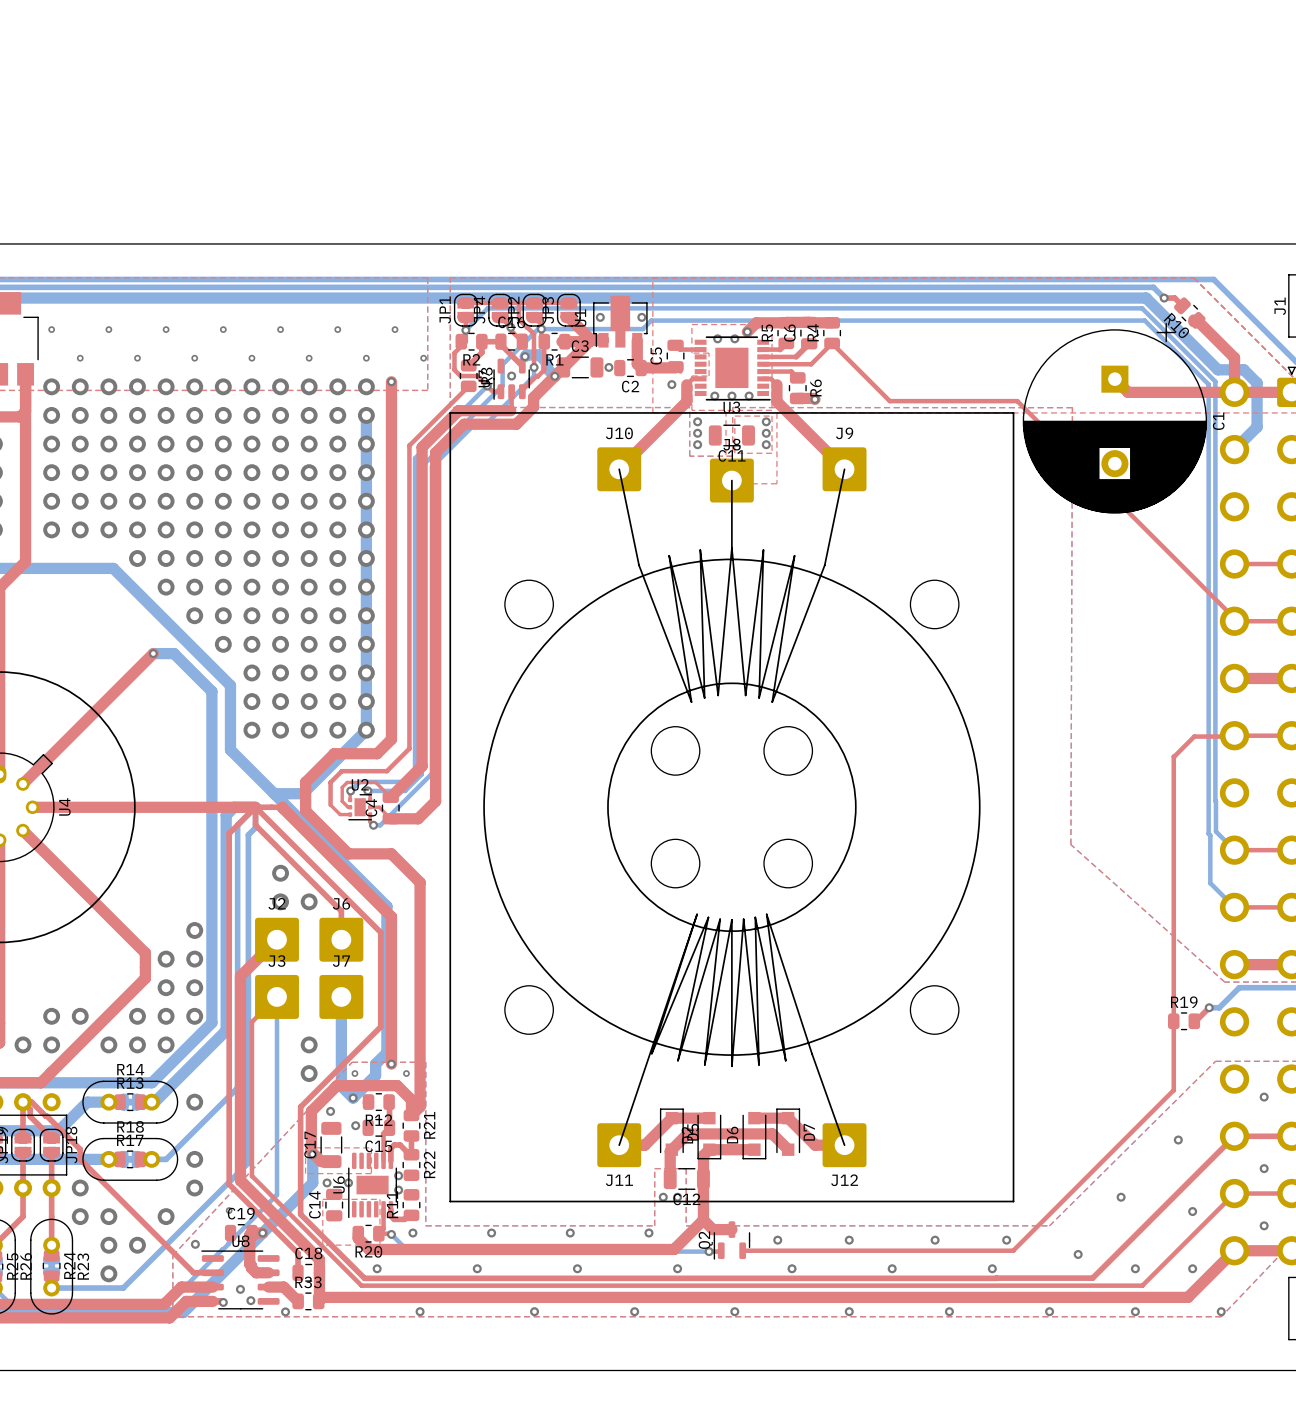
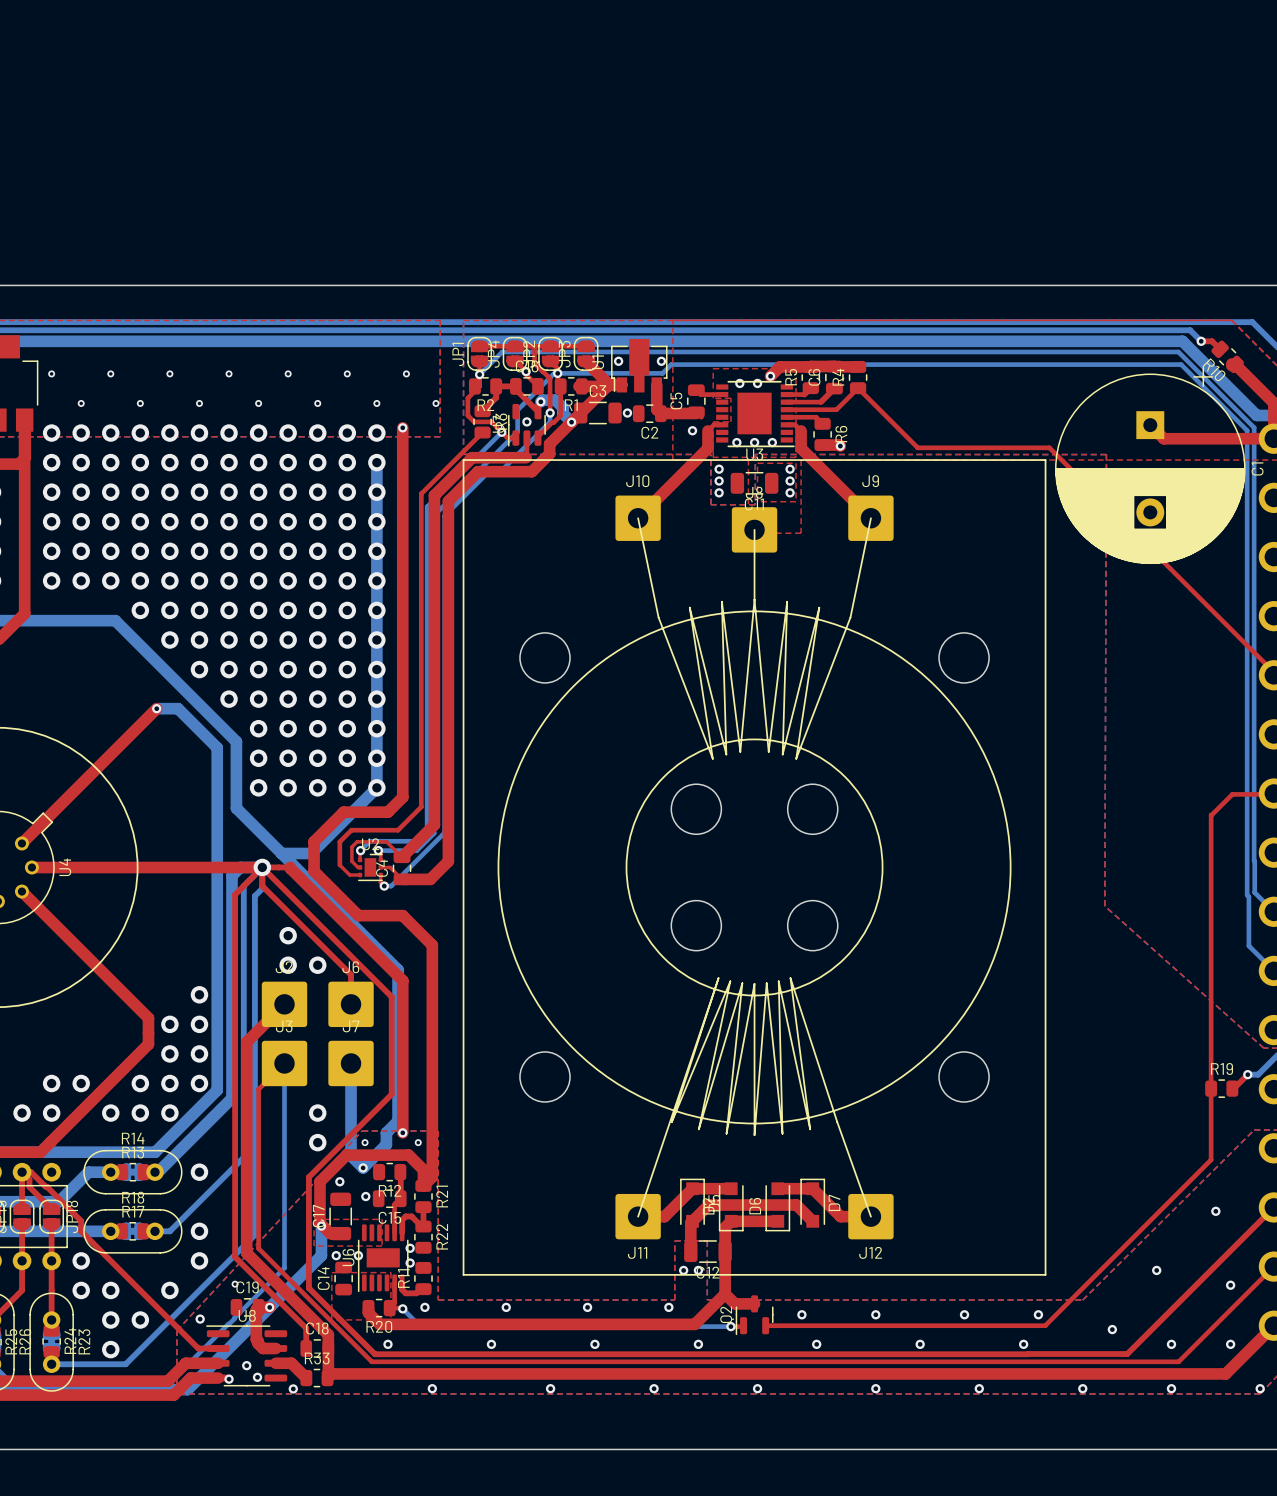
via: none -> (262, 867)

